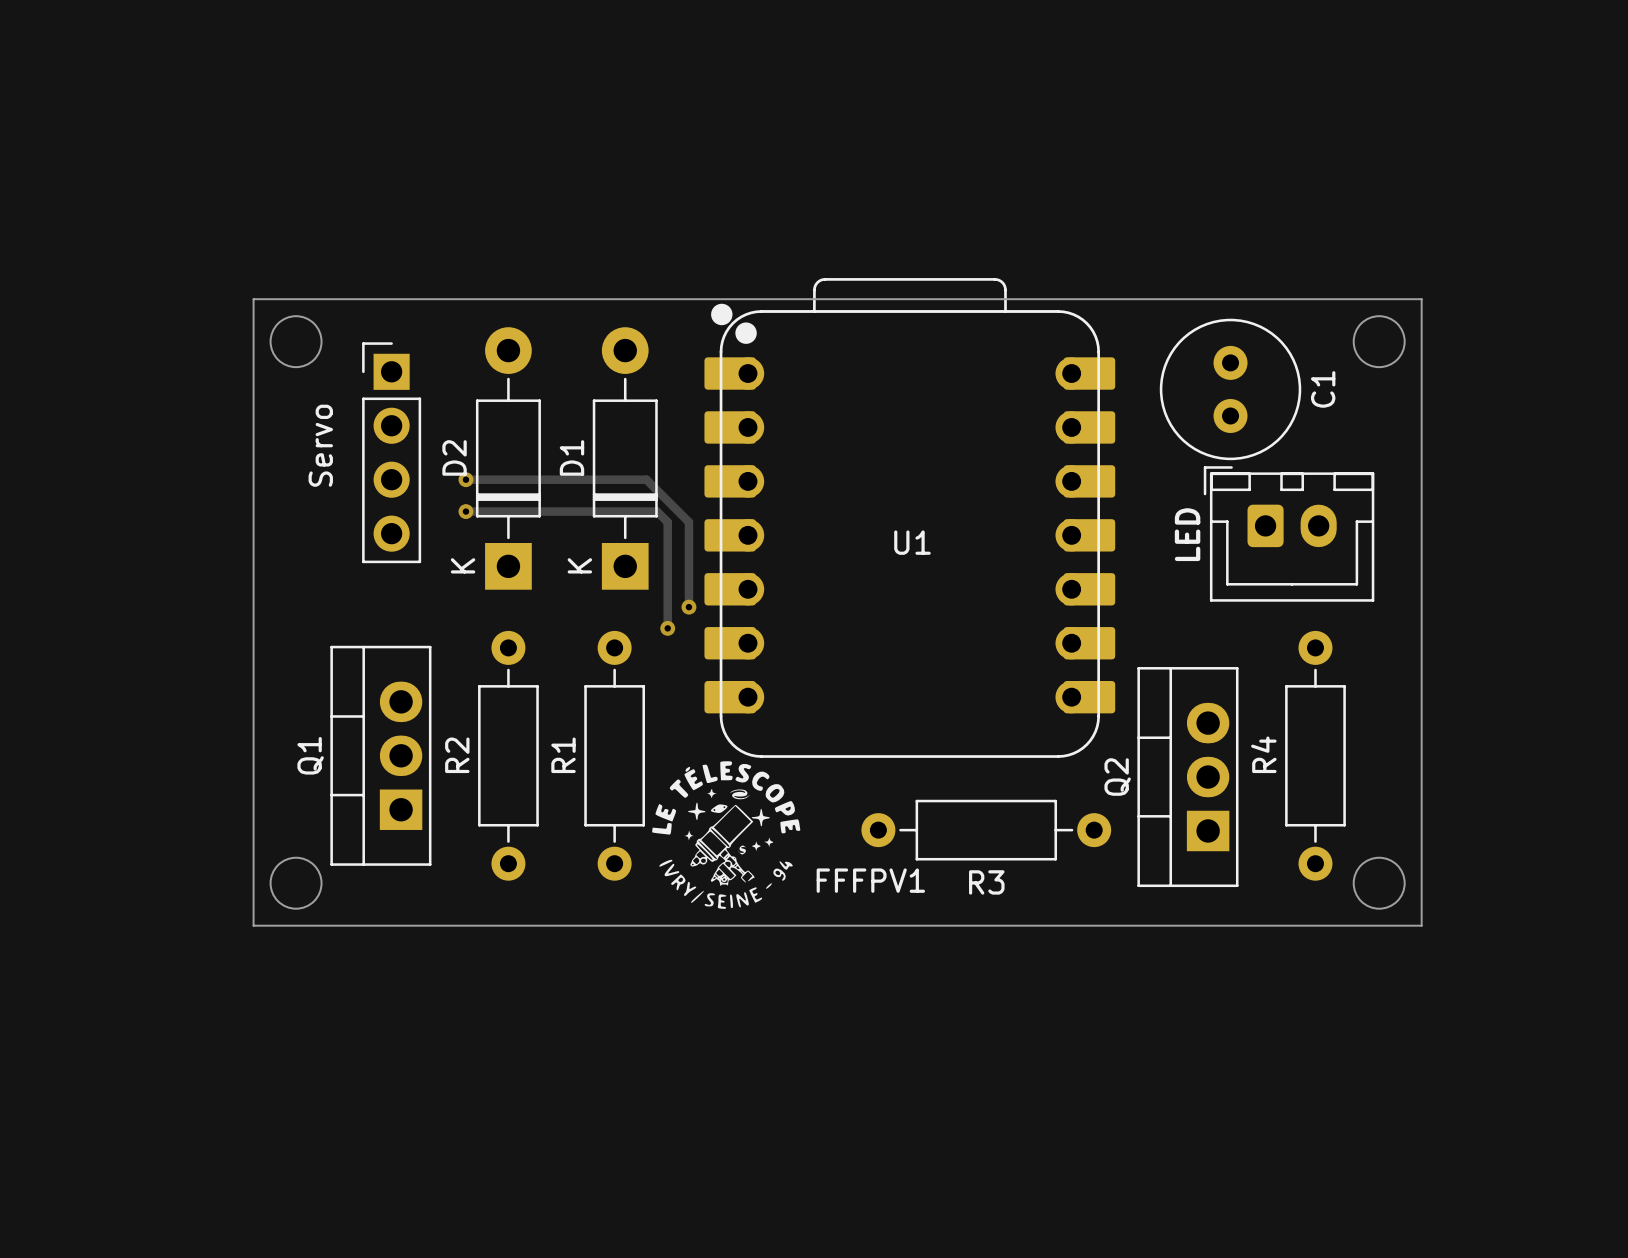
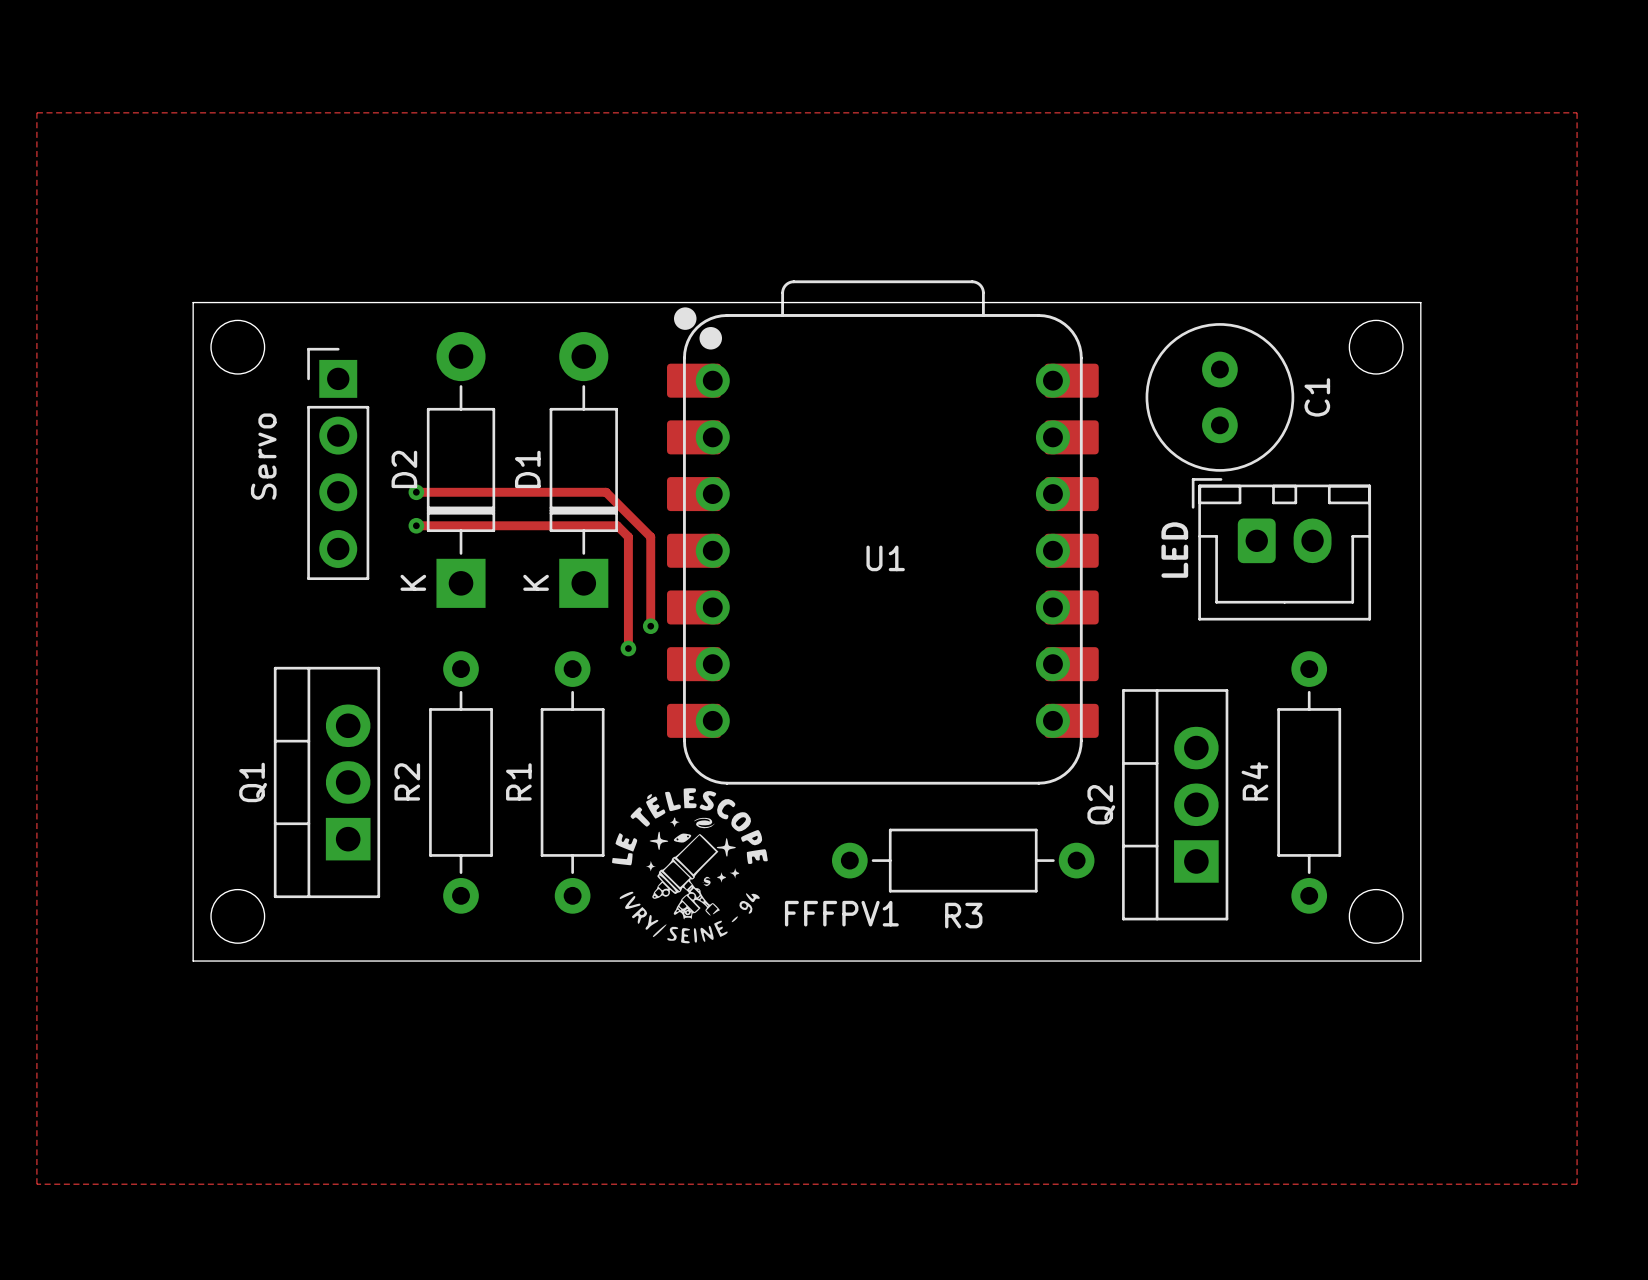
zone outline: none -> (36, 112) (1577, 112) (1577, 1184) (36, 1184) (36, 112)

